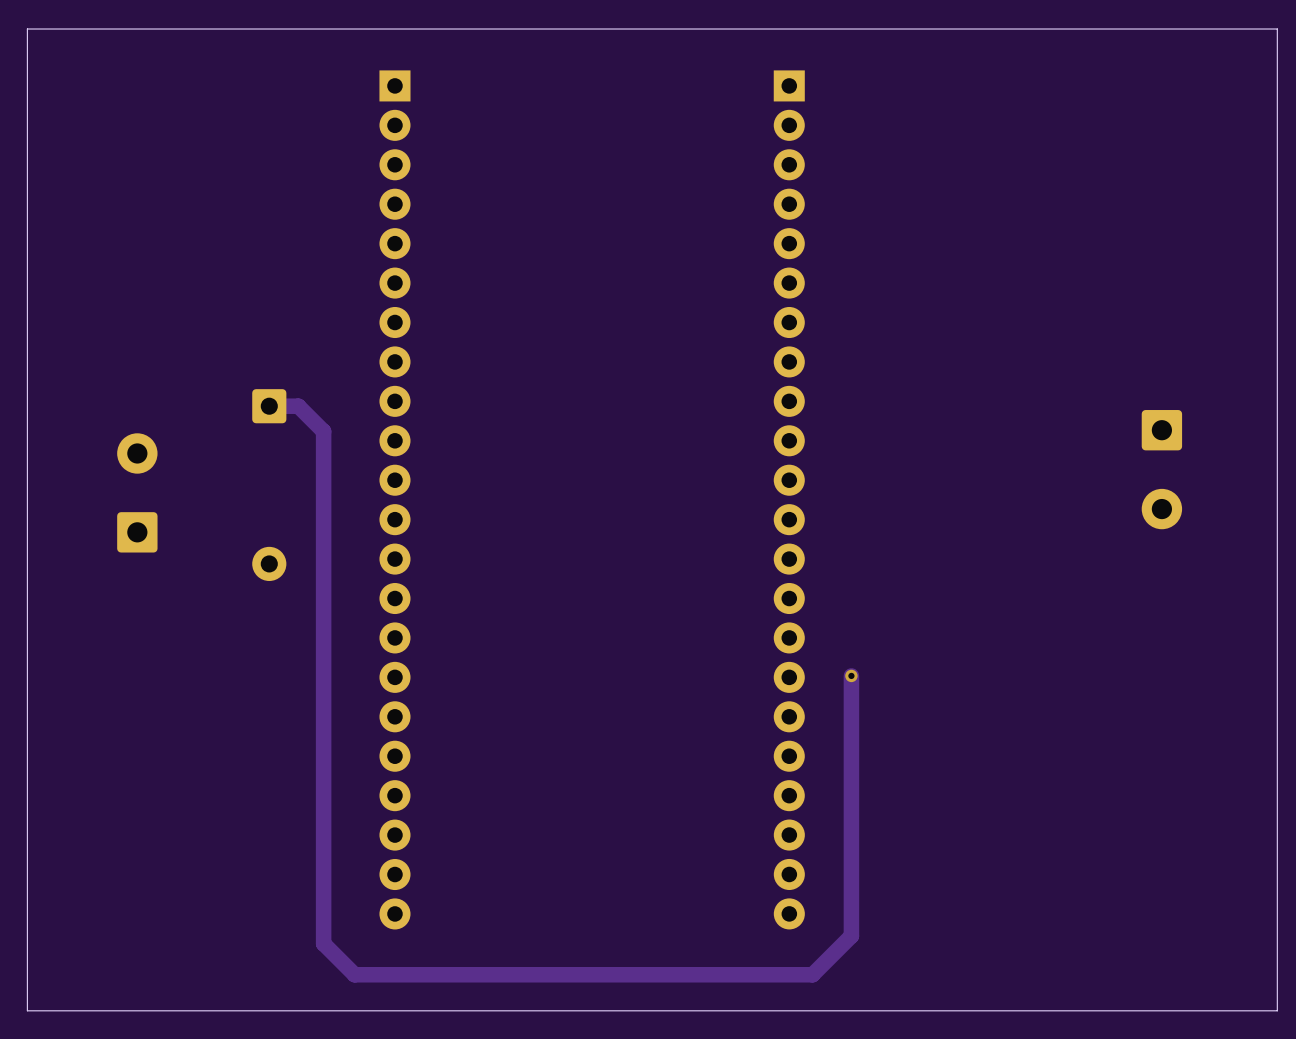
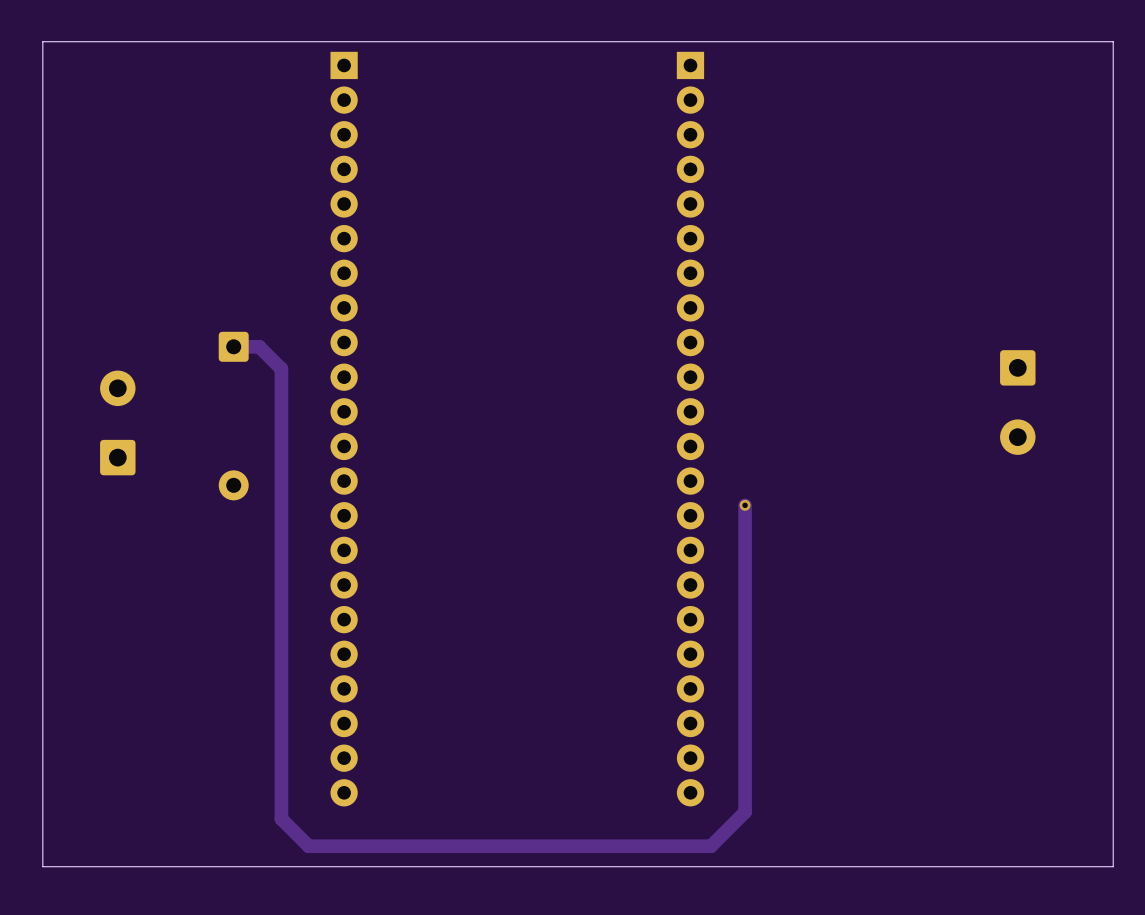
board edge: (1277, 29) (27, 29) (27, 1010) (1277, 1010) (1277, 29) -> (1113, 41) (1113, 866) (42, 866) (42, 41) (1113, 41)
track: none -> (745, 505) (745, 583)
via position: (851, 675) -> (745, 505)

